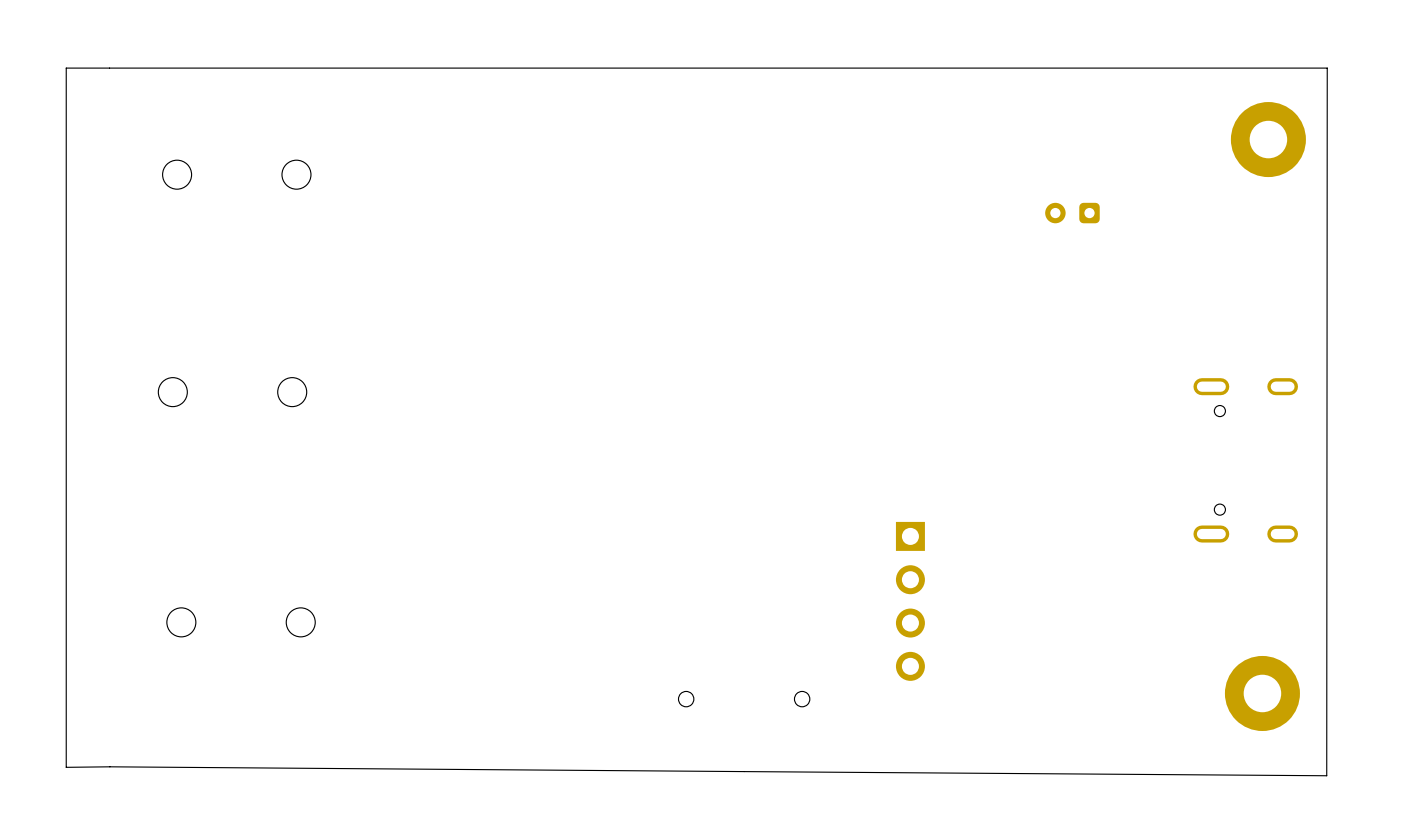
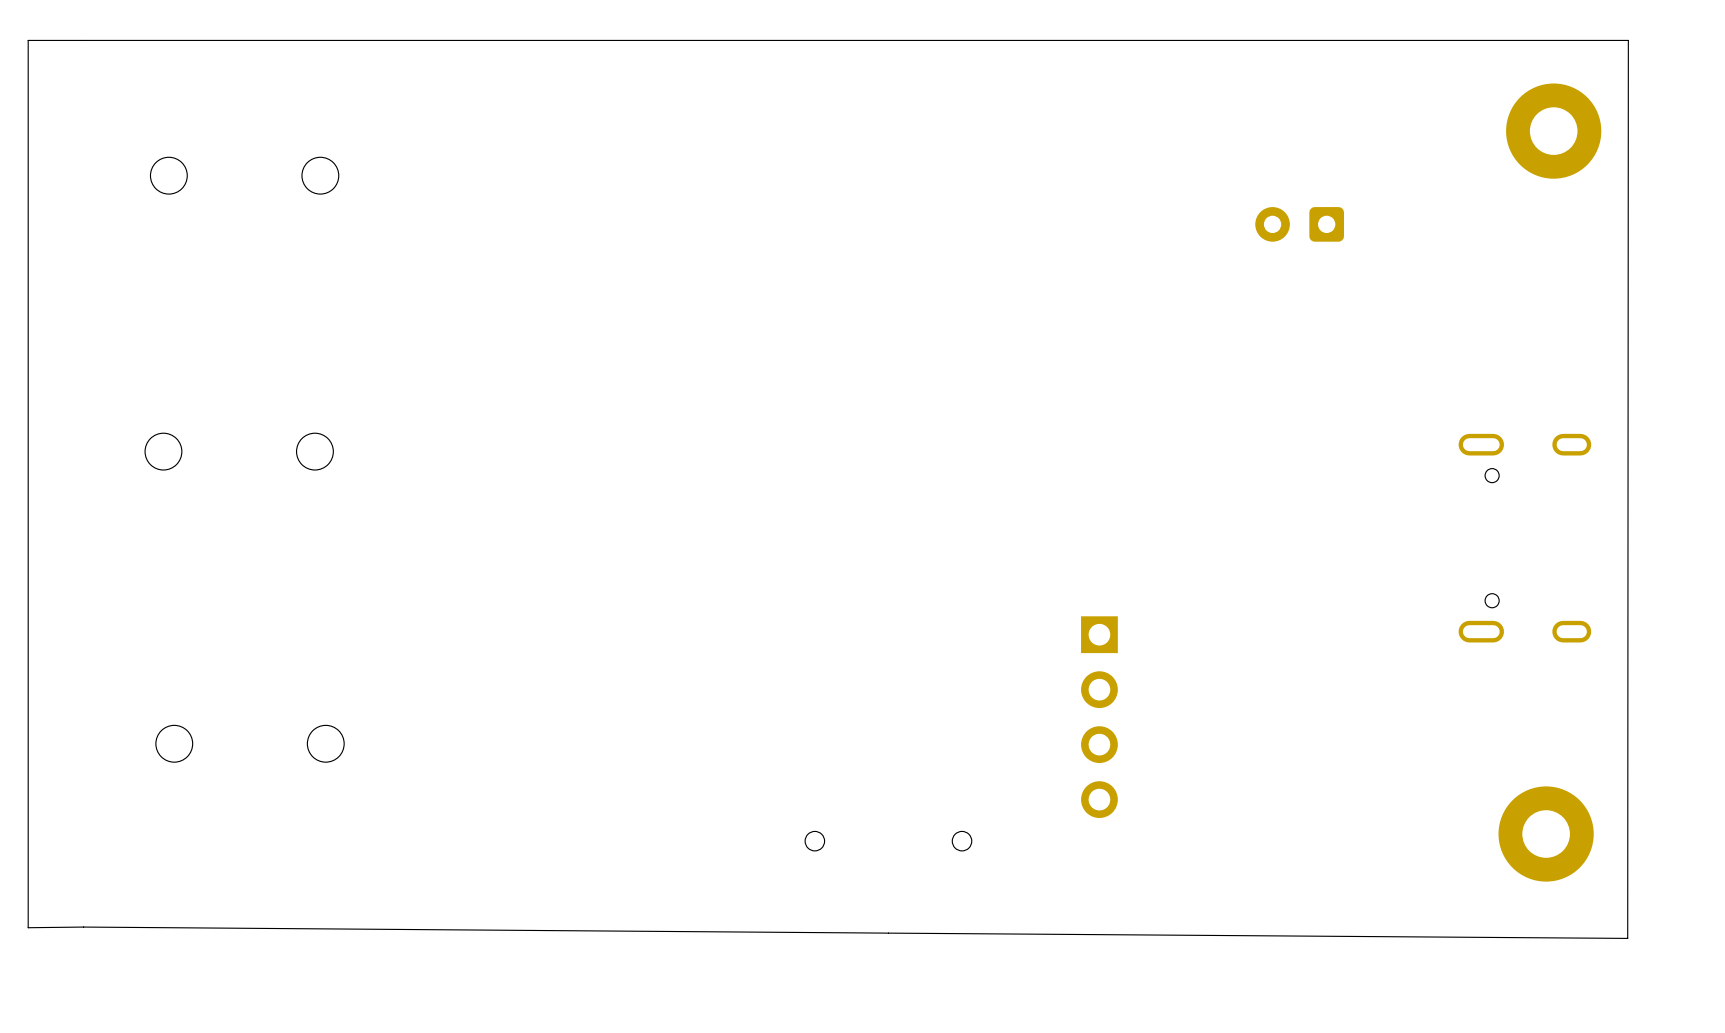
part footprint: [1045, 202, 1100, 224] -> [1255, 207, 1344, 242]

